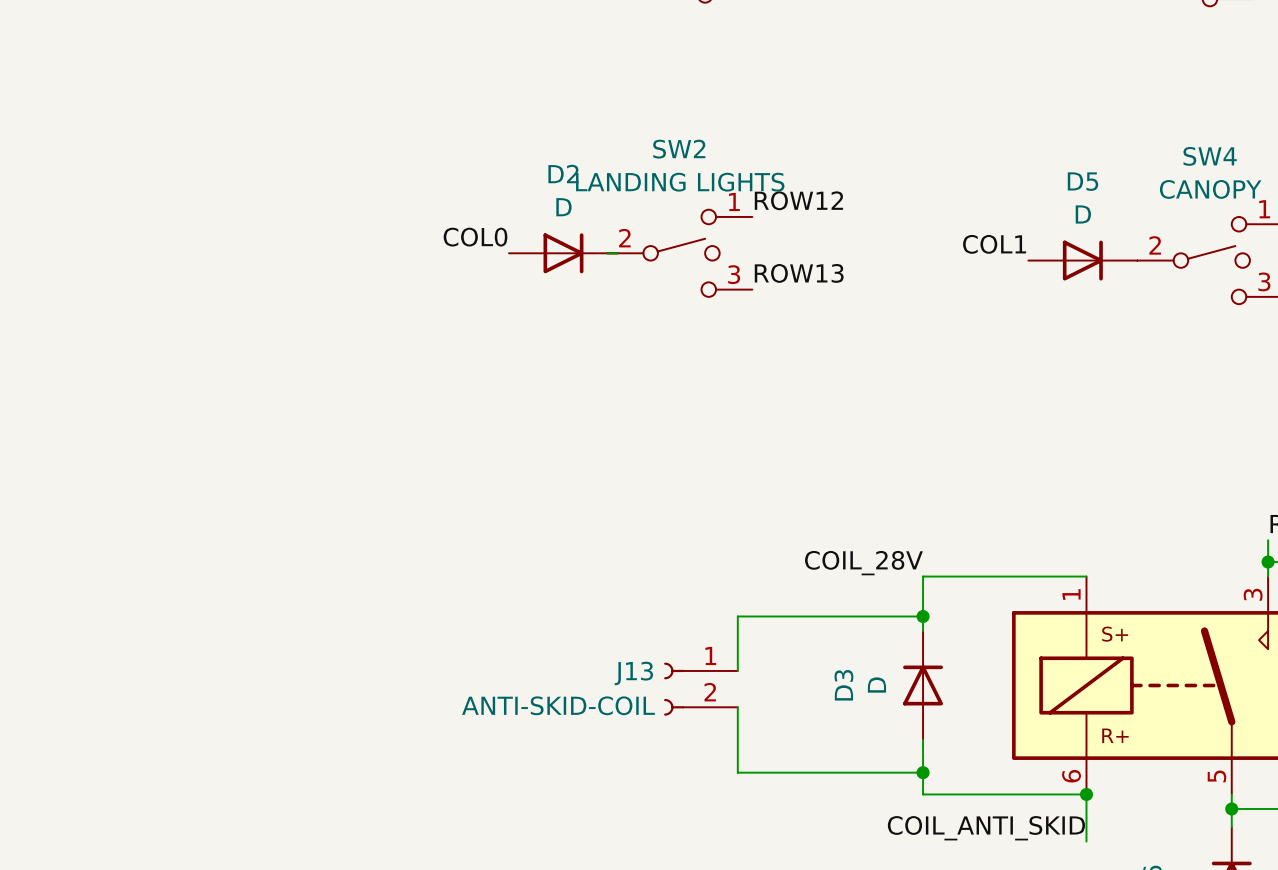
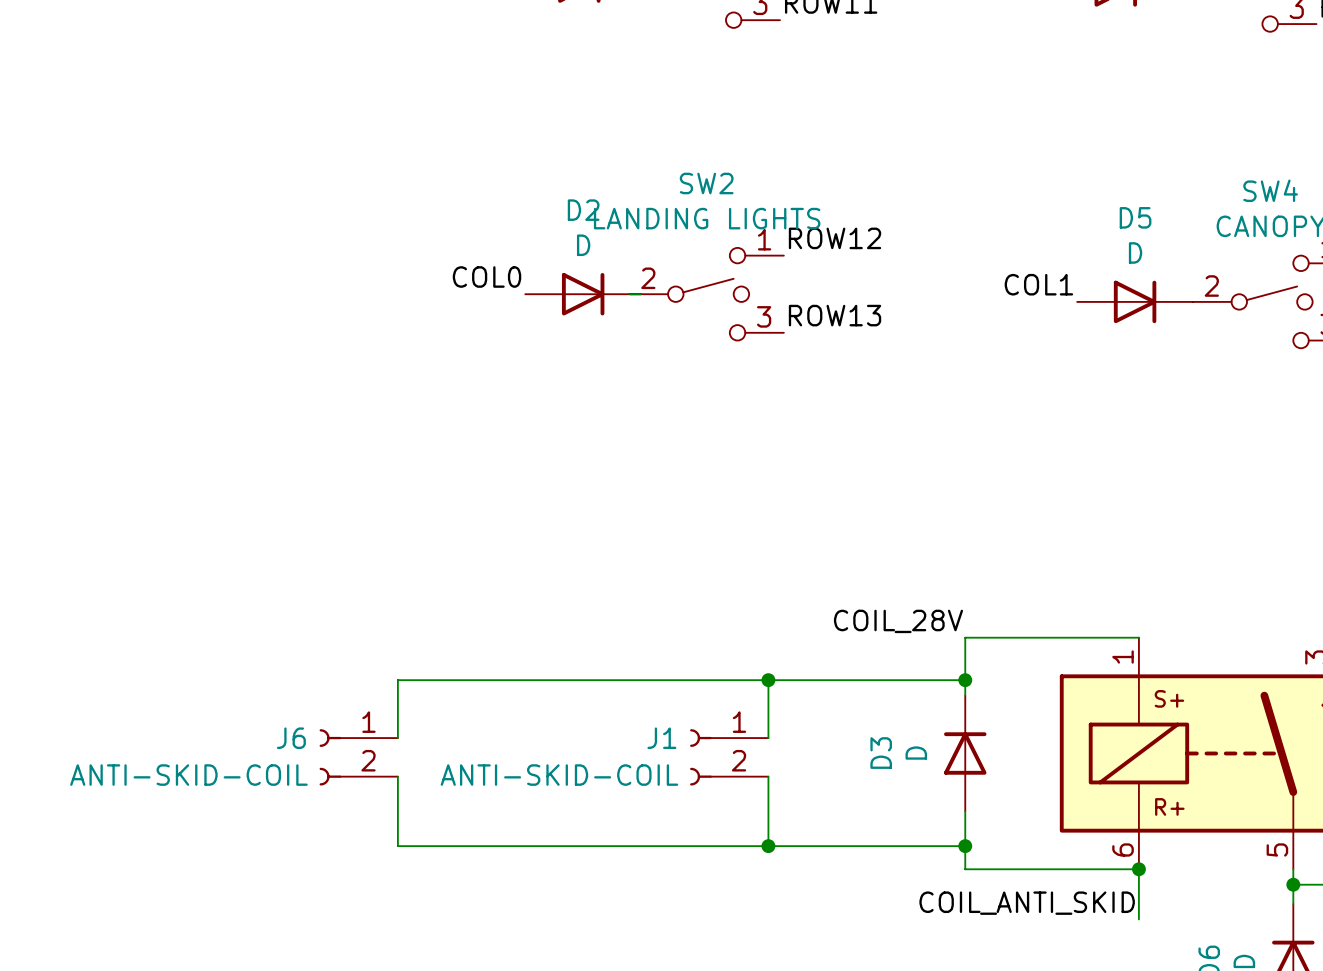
wire: none -> (768, 680) (397, 680) (397, 738)
junction: none -> (768, 680)
J13 name: J13 (633, 673) -> J1 (661, 738)
J6: none -> ANTI-SKID-COIL (358, 757)
wire: none -> (397, 776) (397, 846) (768, 846)
junction: none -> (768, 846)

